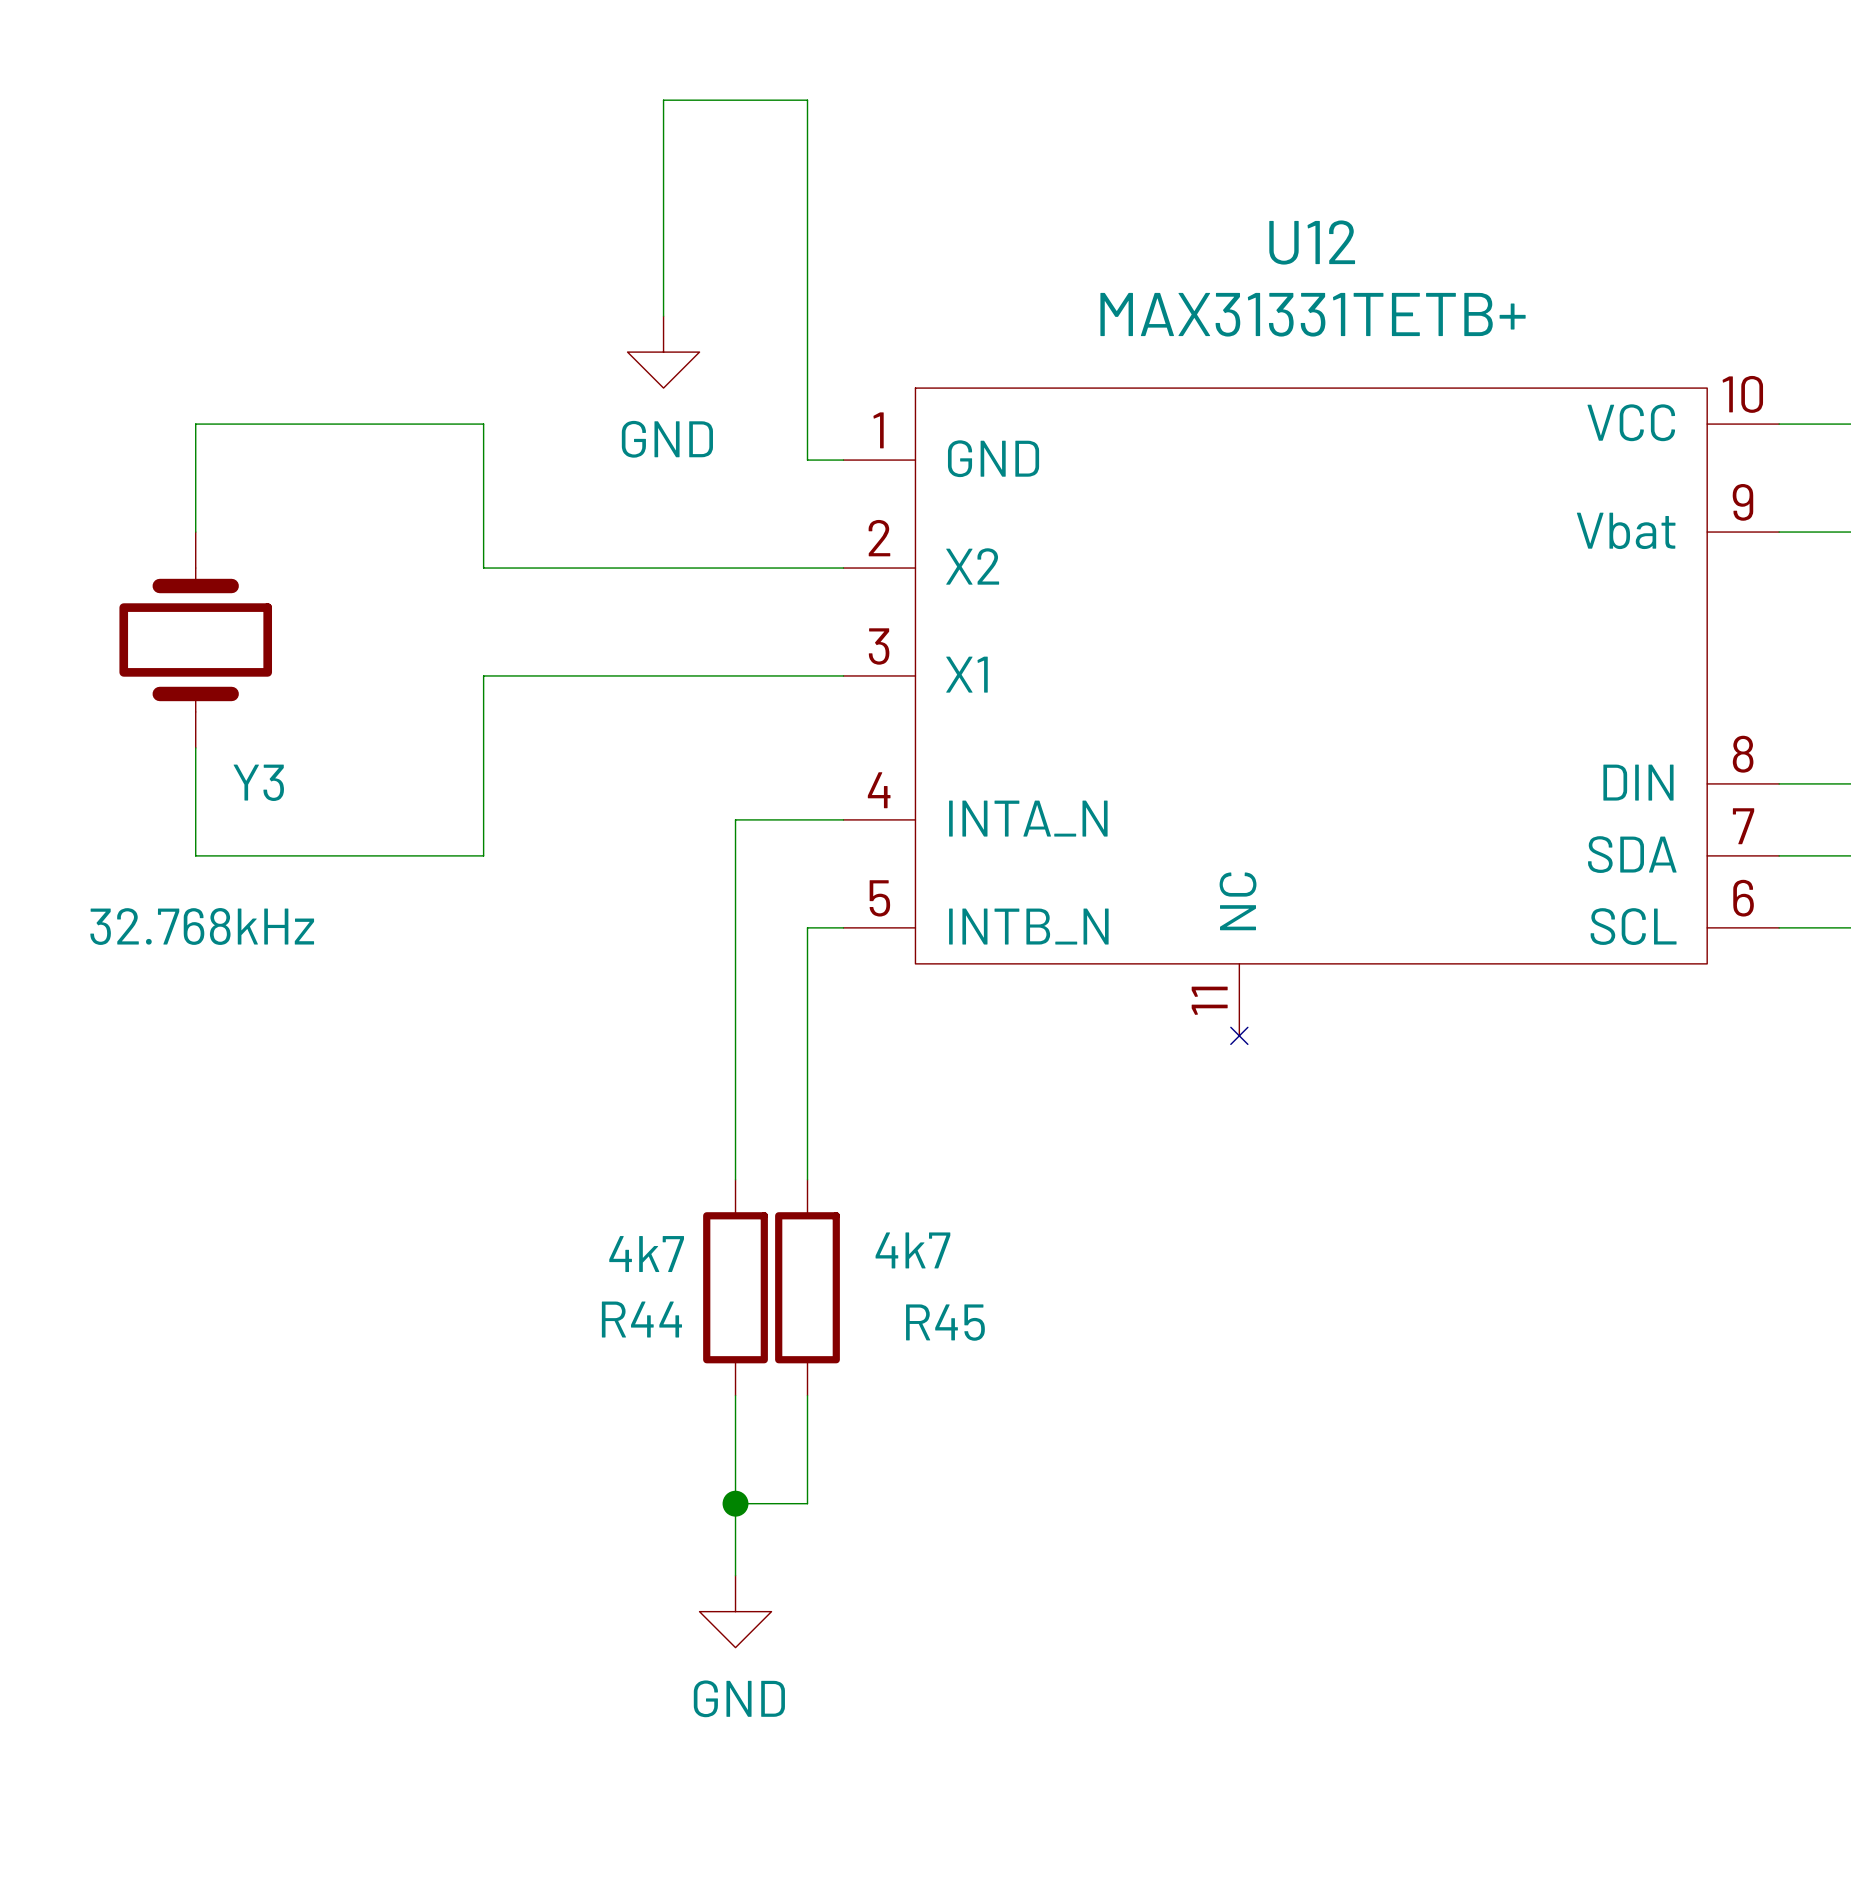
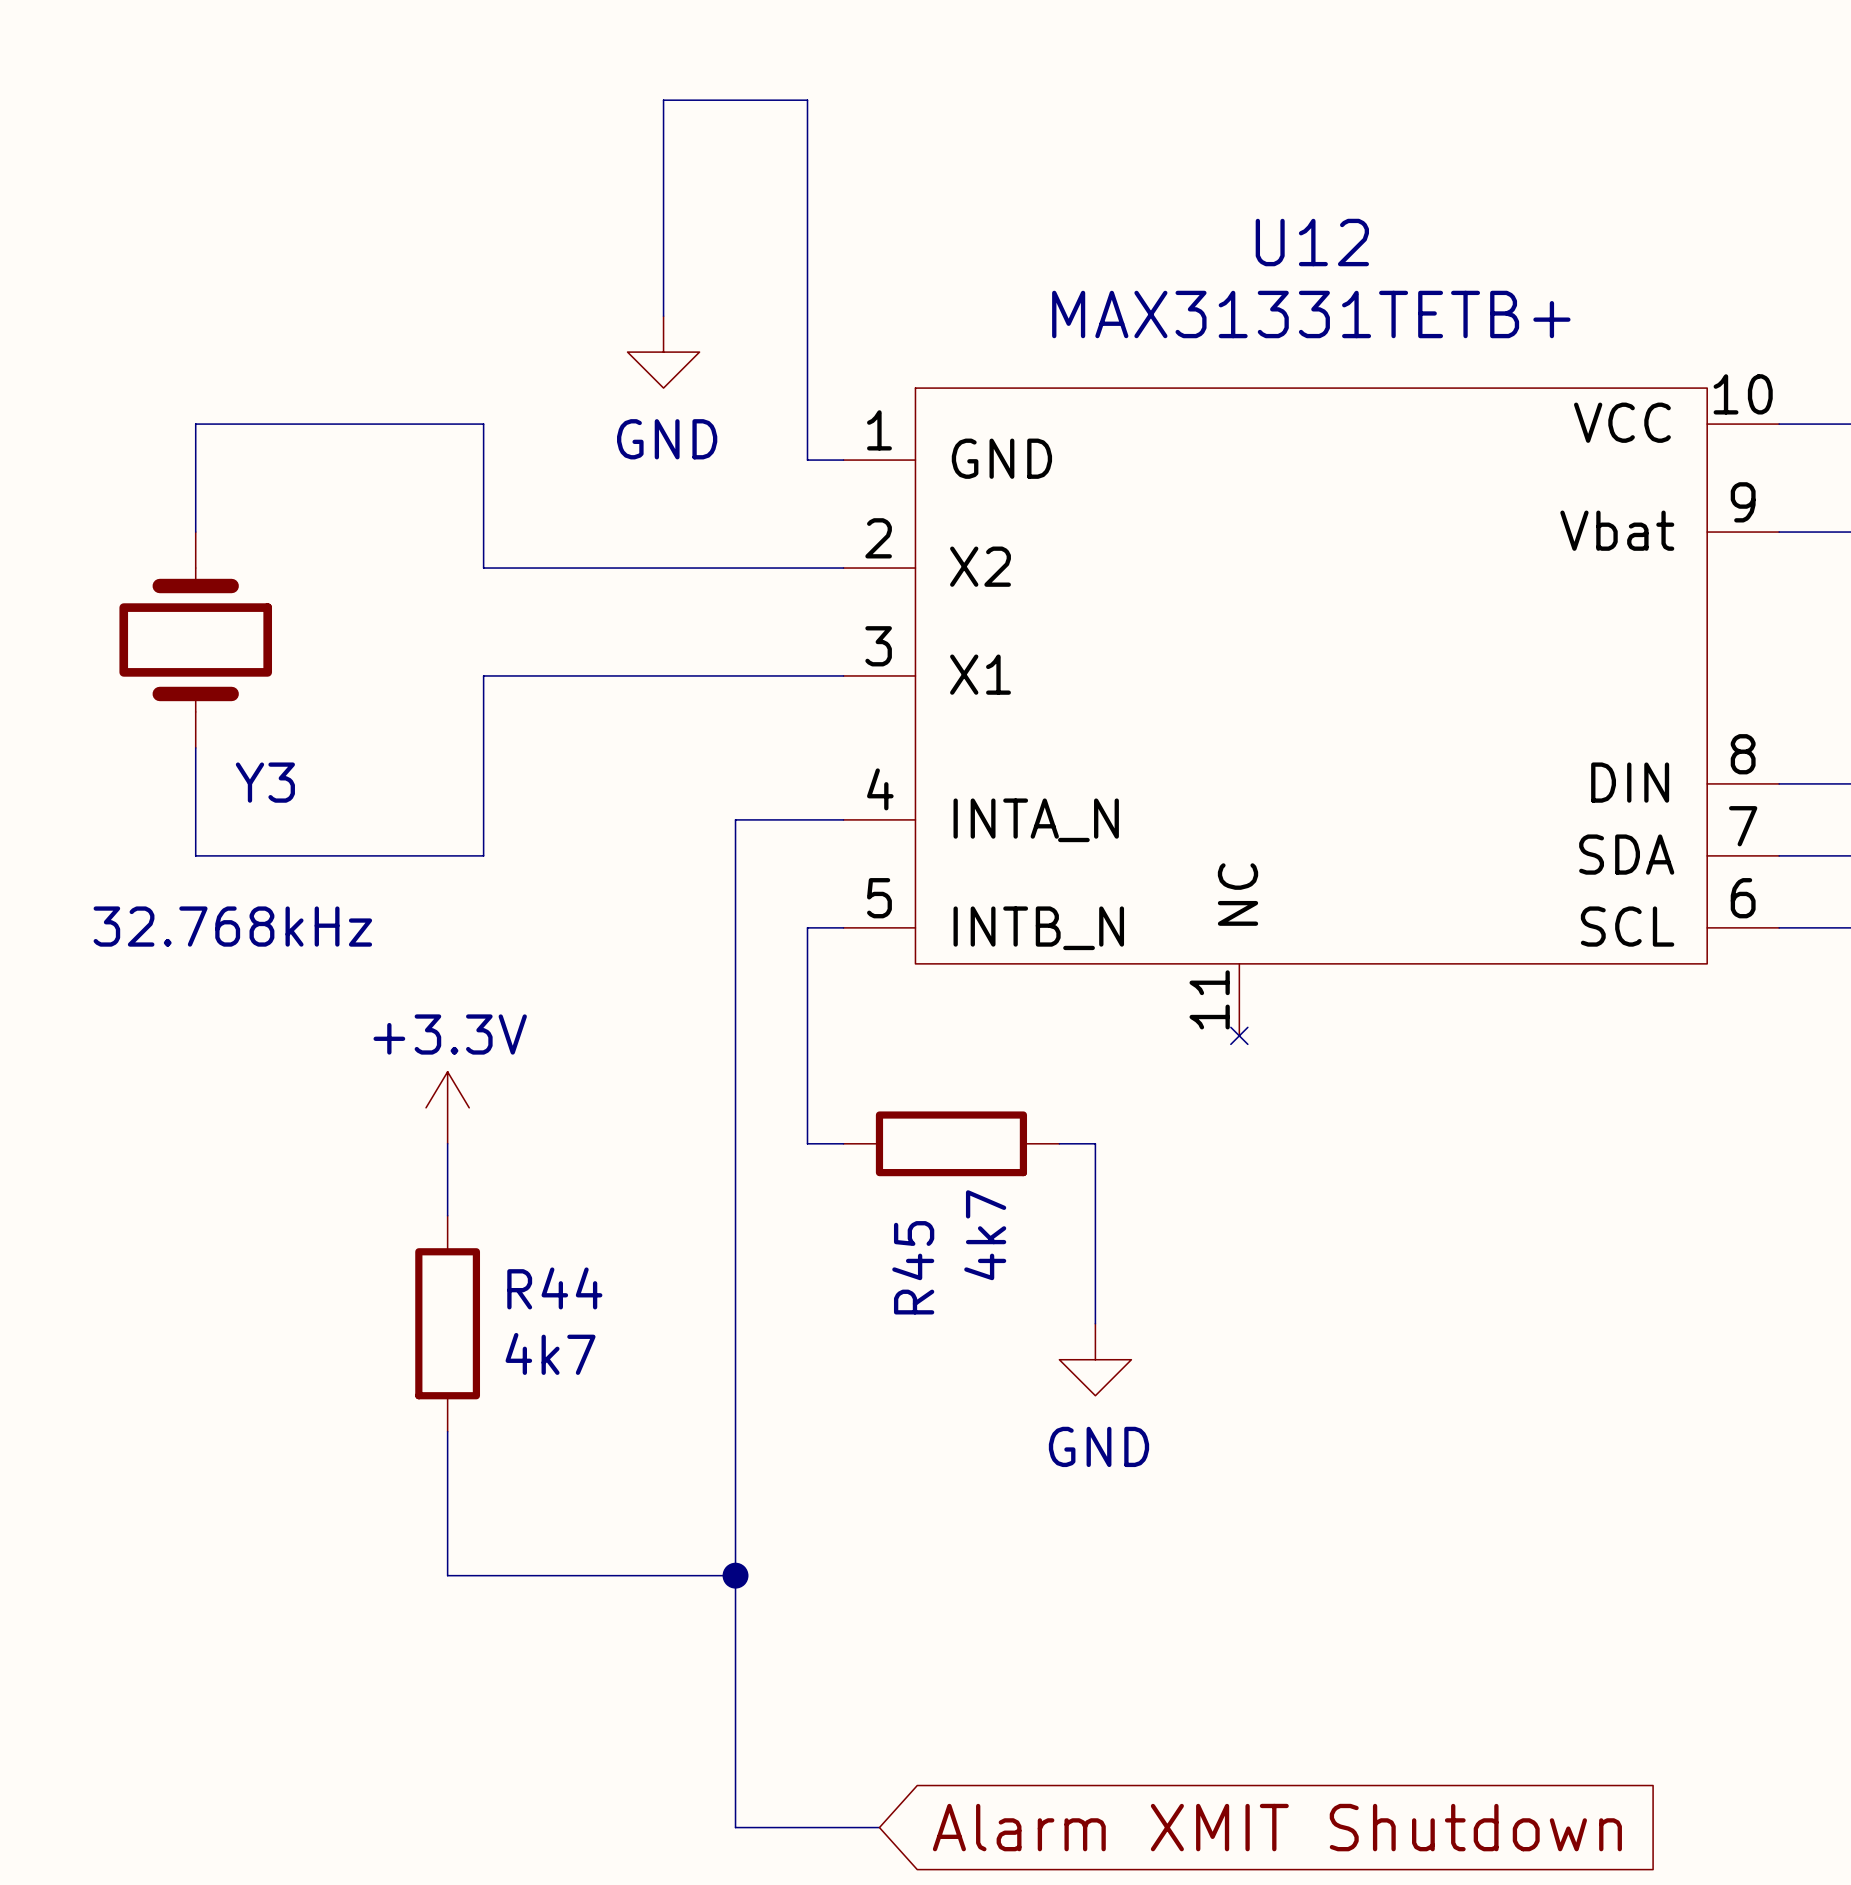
power symbol: none -> +3.3V (447, 1107)
wire: none -> (447, 1143) (447, 1215)
wire: (807, 1143) (807, 1179) -> (807, 1143) (843, 1143)
wire: none -> (1059, 1143) (1095, 1143) (1095, 1323)
wire: none -> (735, 1179) (735, 1395)
R44 value position: 4k7 (646, 1254) -> 4k7 (550, 1353)
R44 position: (735, 1287) -> (447, 1323)
R45 rotation: 0° (807, 1287) -> 90° clockwise (951, 1143)
R45 position: (807, 1287) -> (951, 1143)
R44 name position: R44 (641, 1319) -> R44 (554, 1288)
wire: (807, 1395) (807, 1503) (735, 1503) -> none
wire: none -> (447, 1431) (447, 1575) (735, 1575) (735, 1827) (879, 1827)
junction position: (735, 1503) -> (735, 1575)
power symbol position: GND (735, 1611) -> GND (1095, 1359)
global label: none -> Alarm XMIT Shutdown (1277, 1827)

